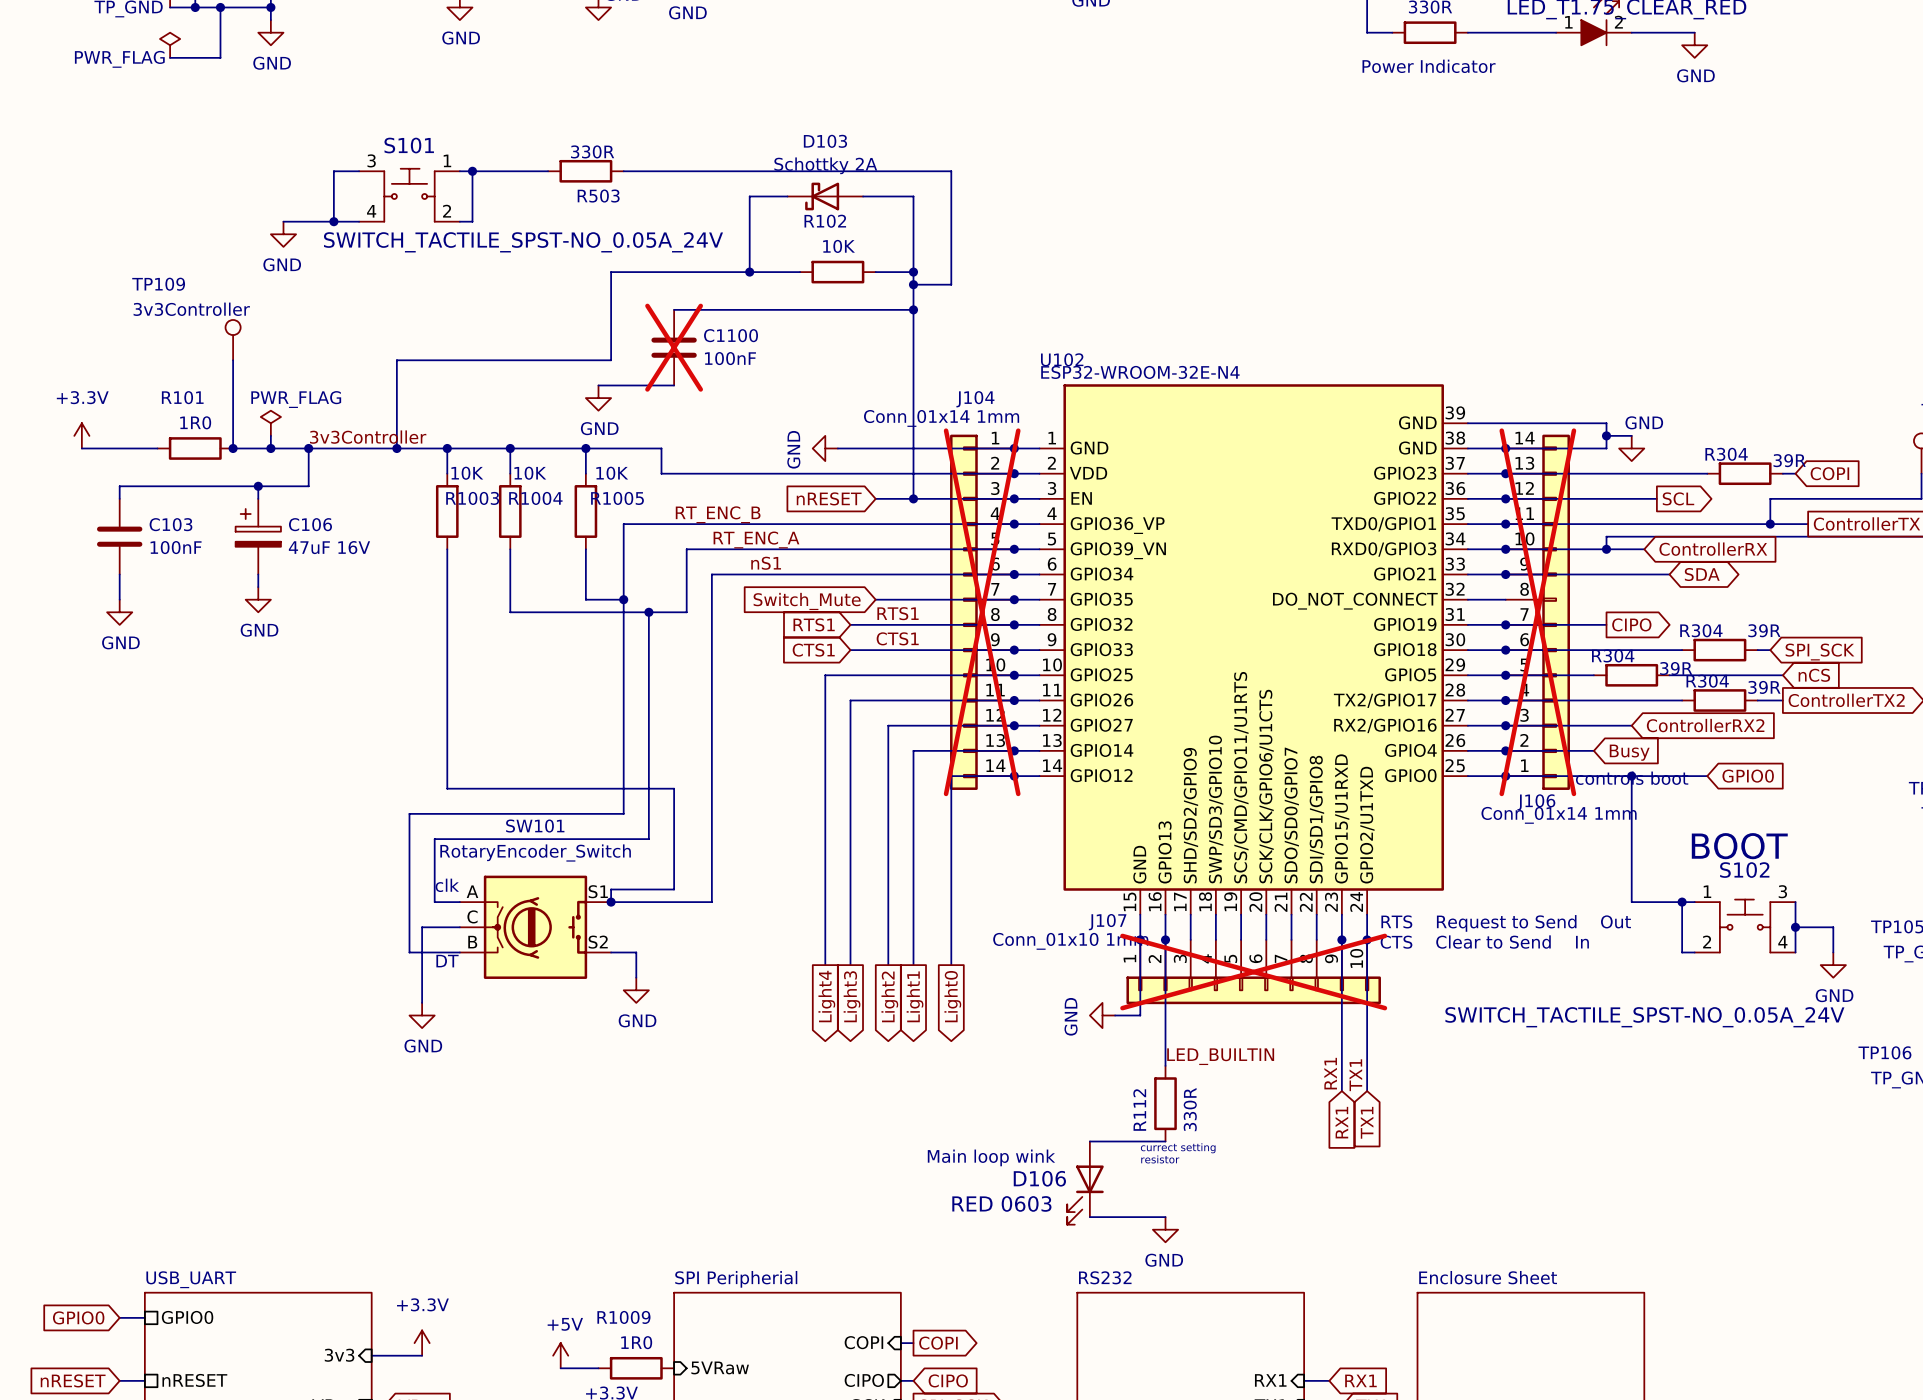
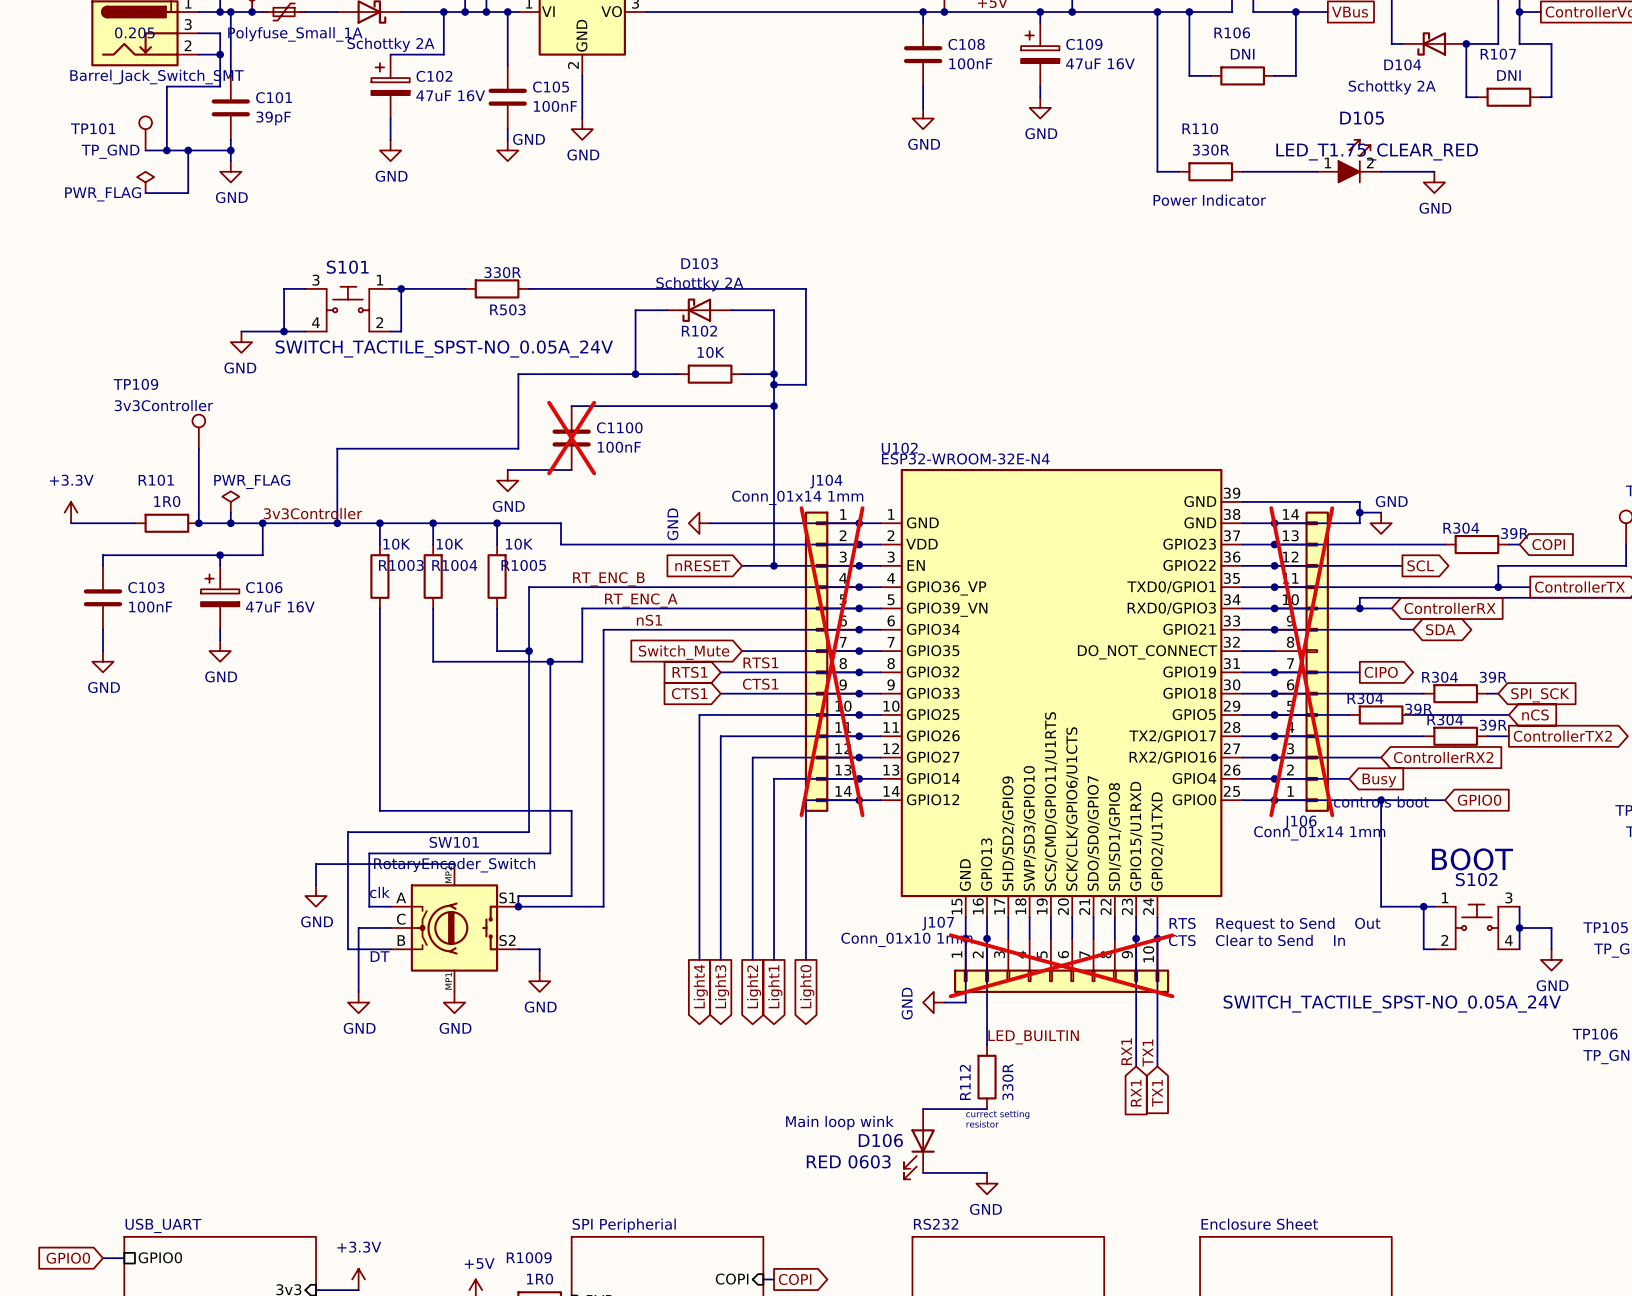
wire: none -> (454, 864) (316, 864) (316, 885)
SW101 symbol: [459, 875, 612, 979] -> [390, 864, 519, 992]
power symbol: none -> GND (316, 896)
power symbol: none -> GND (454, 1002)

